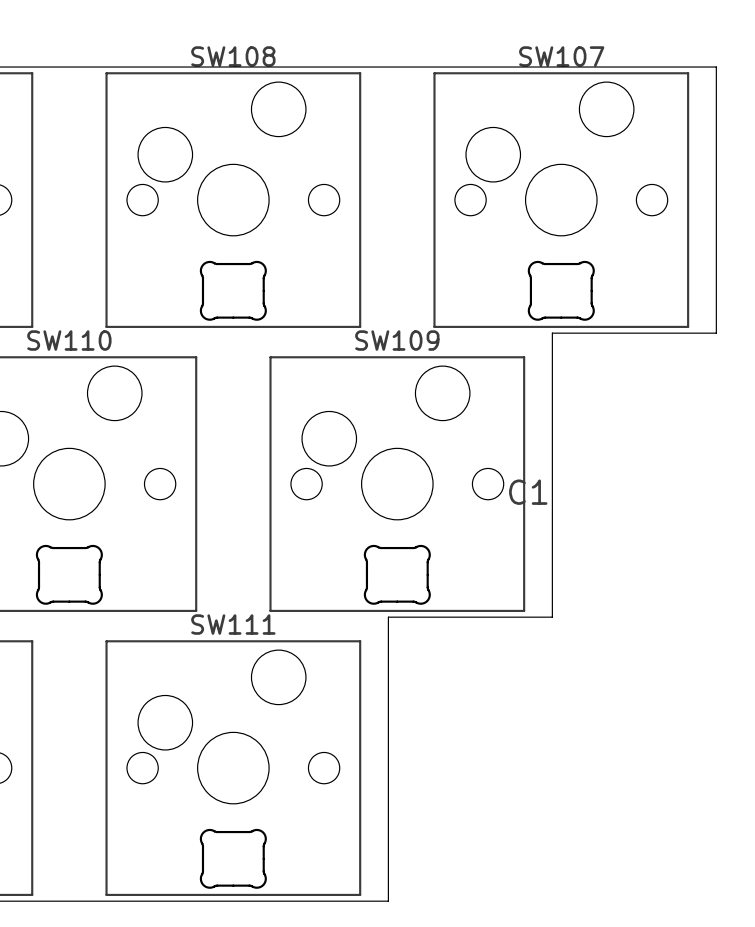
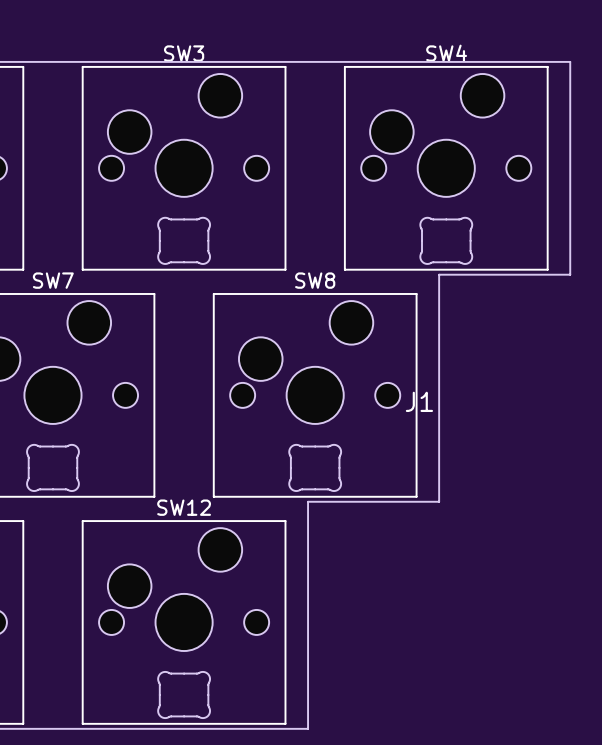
SW108 name: SW108 (233, 56) -> SW3 (184, 53)
SW107 name: SW107 (561, 56) -> SW4 (446, 53)
SW110 name: SW110 (69, 340) -> SW7 (53, 280)
SW109 name: SW109 (397, 340) -> SW8 (315, 280)
C1 name: C1 (528, 492) -> J1 (419, 401)
SW111 name: SW111 (233, 624) -> SW12 (184, 507)

